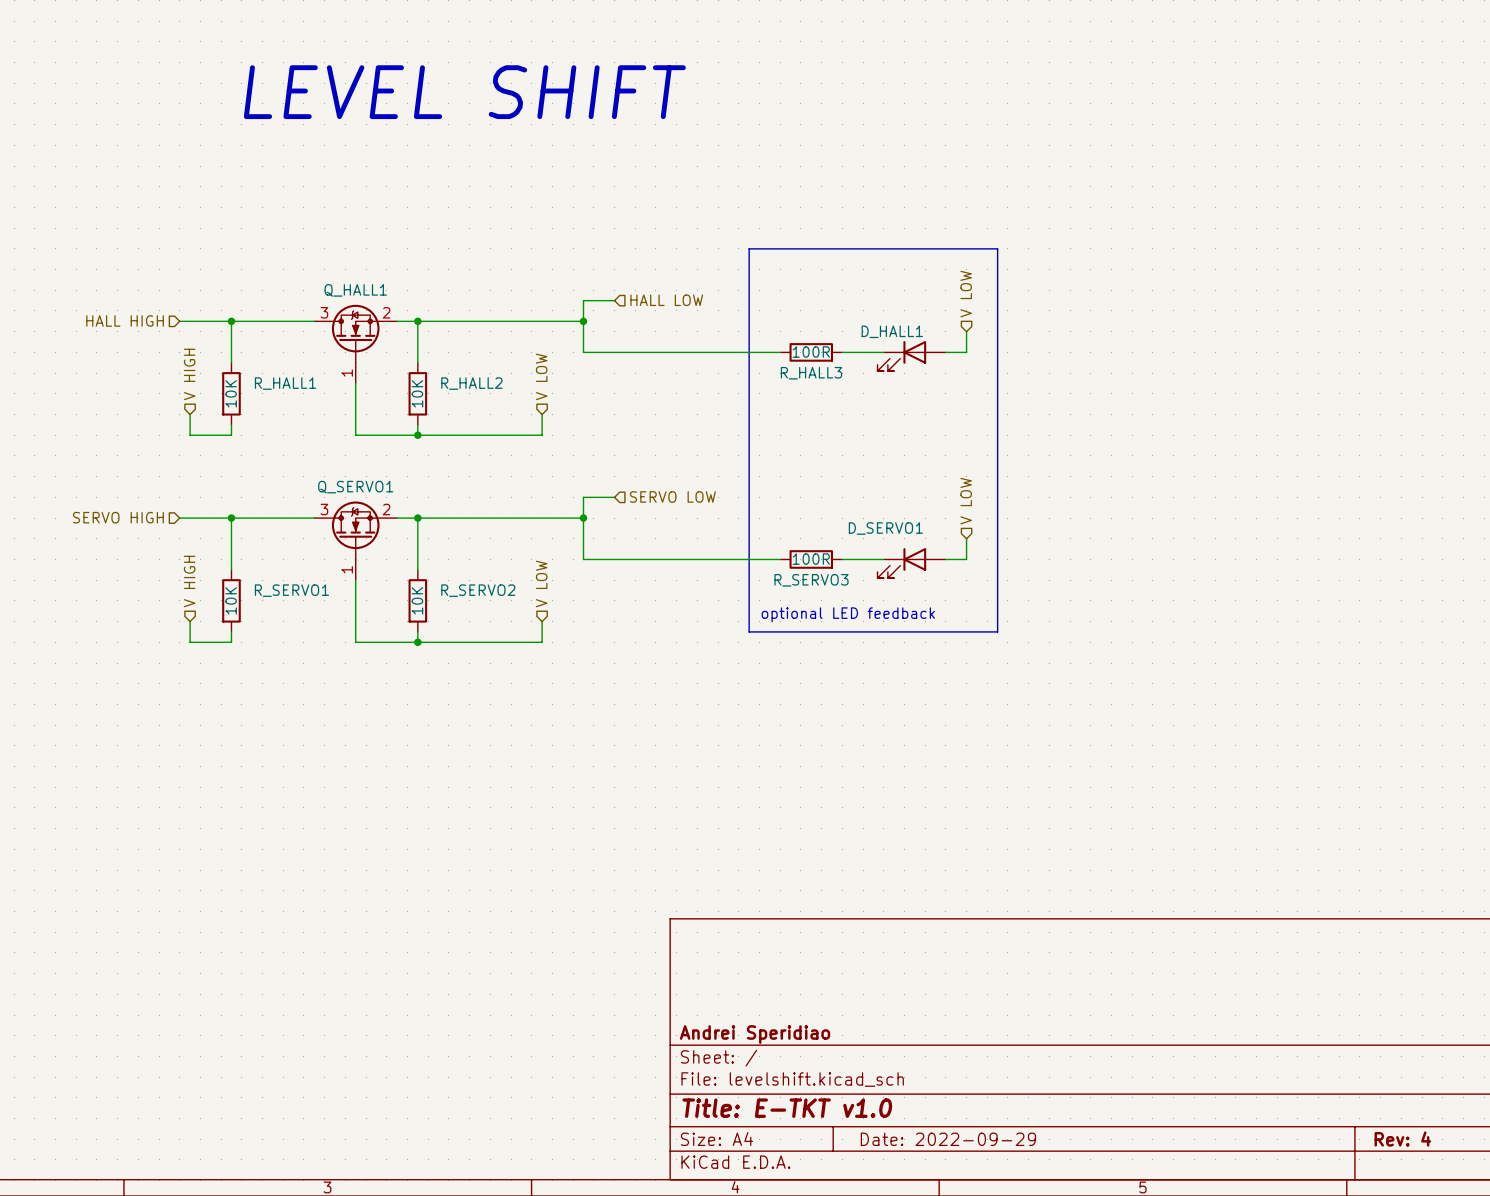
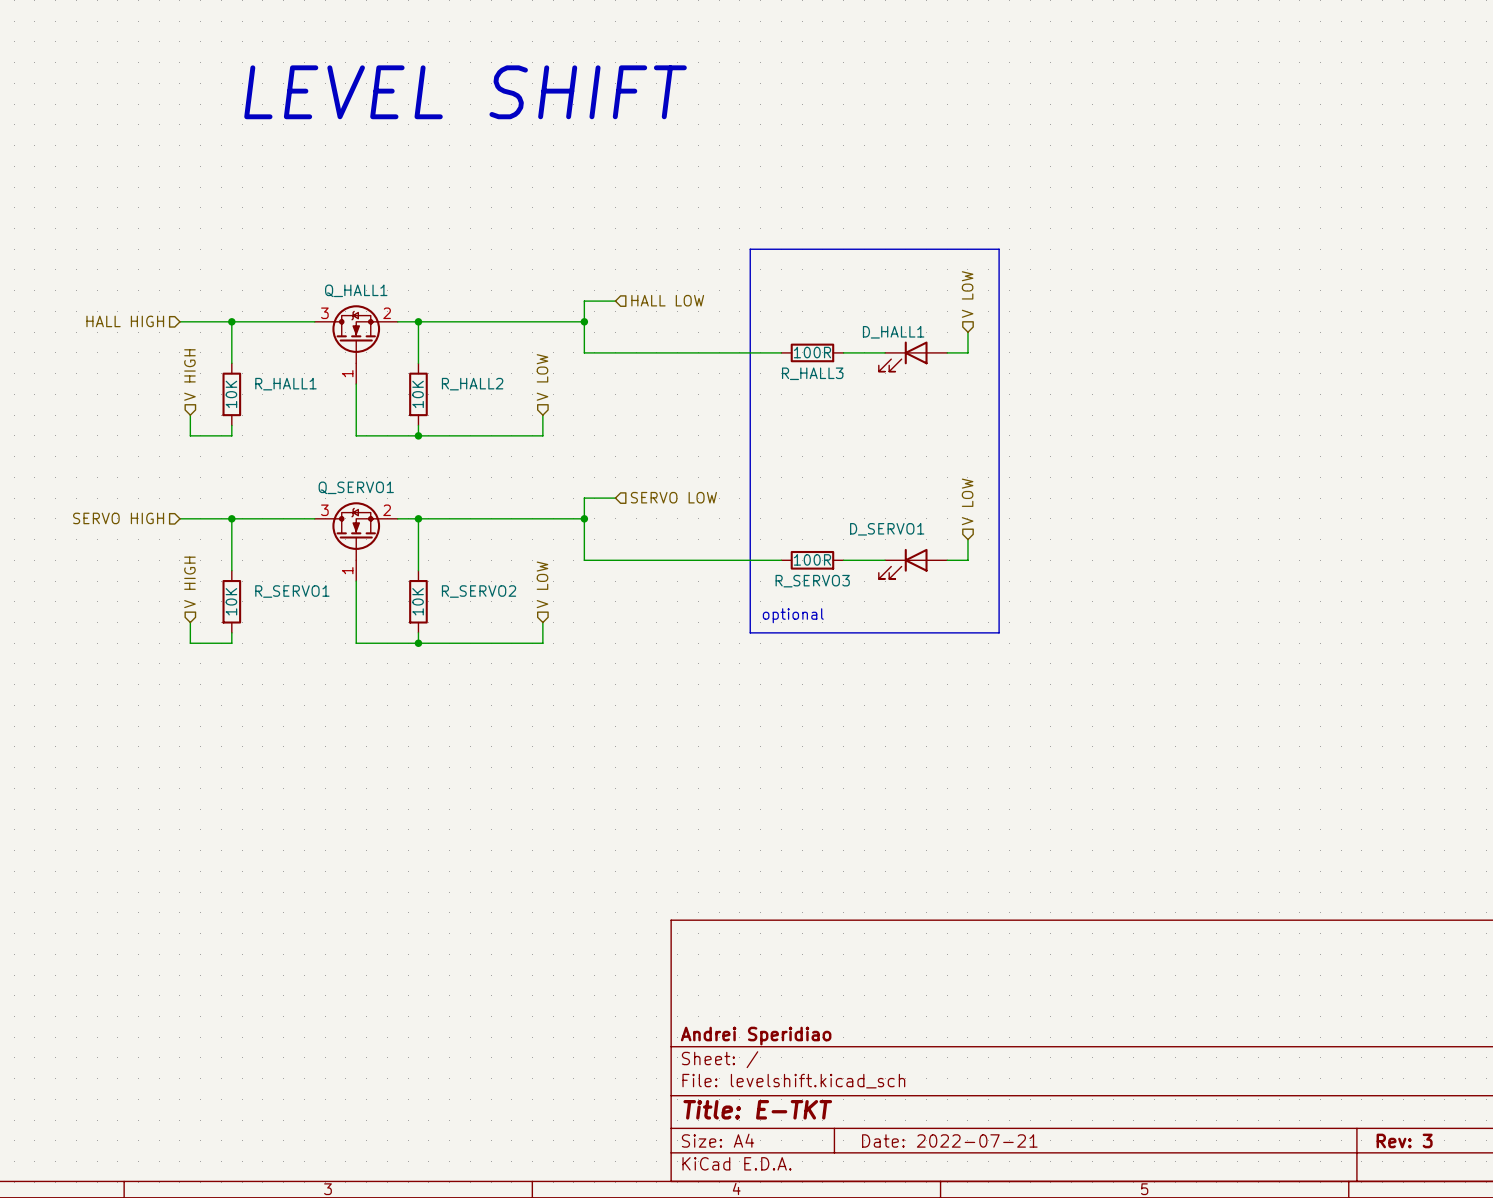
text: optional LED feedback (848, 614) -> optional (793, 615)
title block: Title: E-TKT v1.0 (787, 1108) -> Title: E-TKT (757, 1109)
title block: Date: 2022-09-29 (948, 1139) -> Date: 2022-07-21 (949, 1140)
title block: Rev: 4 (1402, 1139) -> Rev: 3 (1404, 1140)

